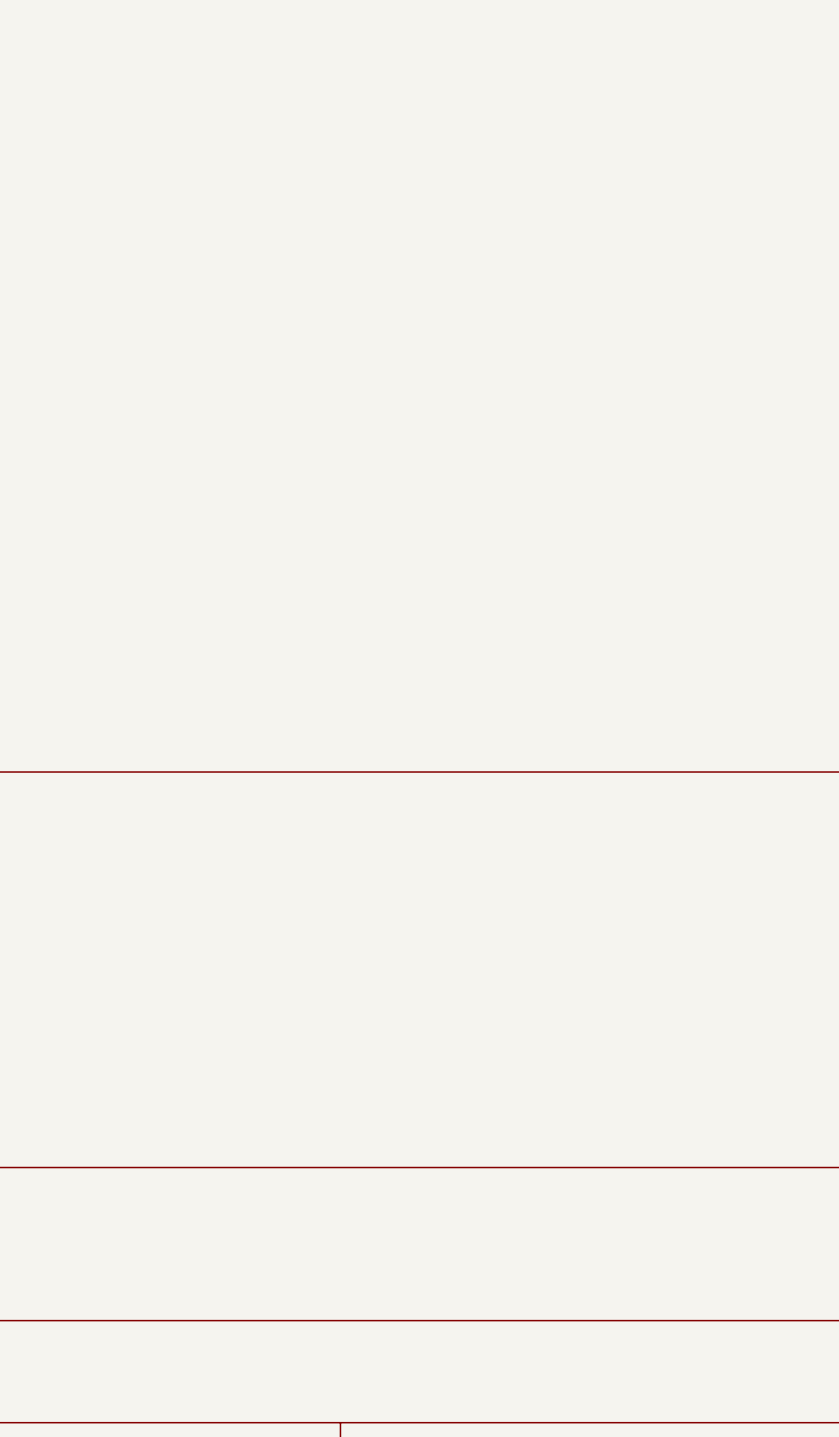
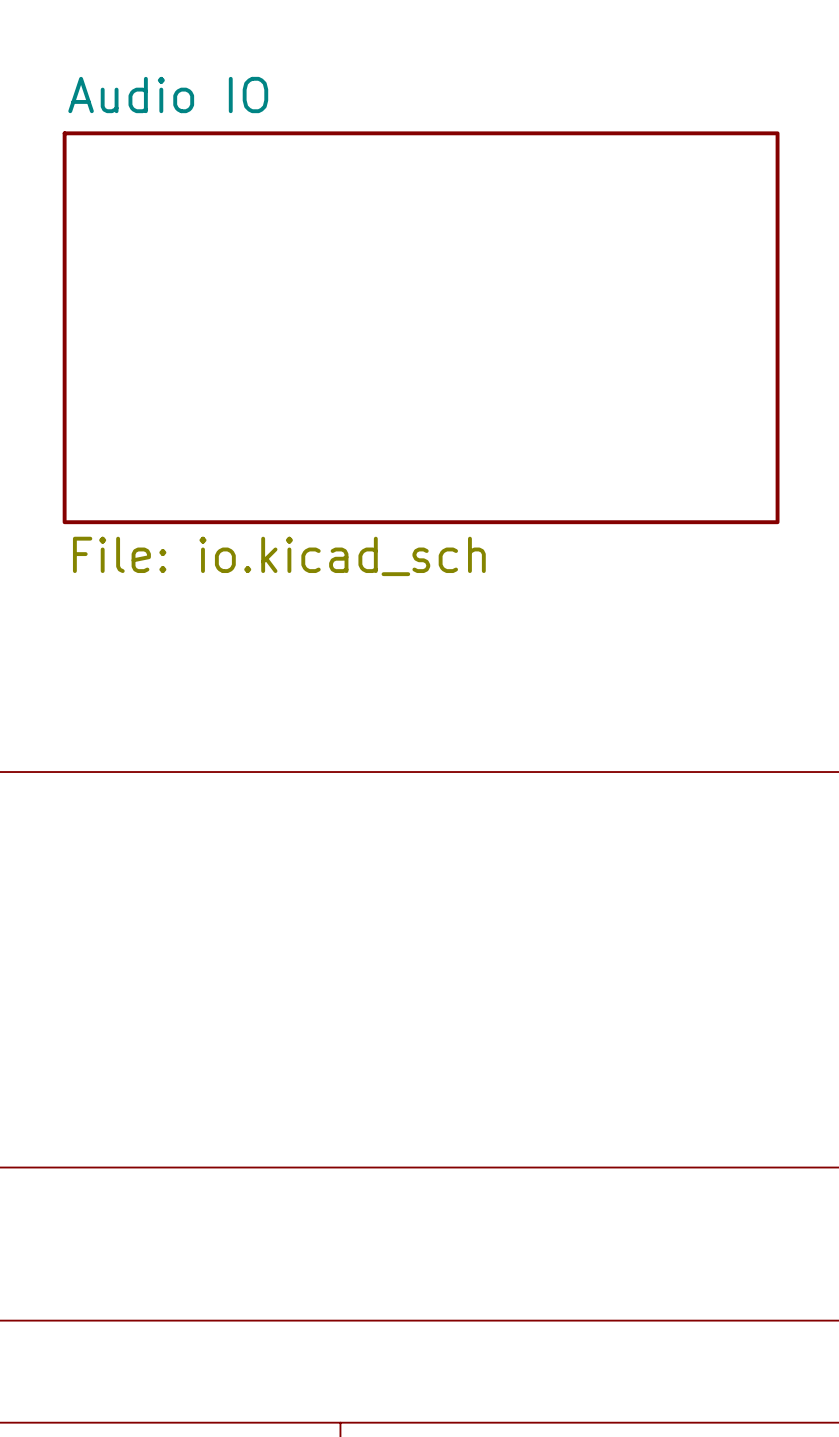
sheet Audio IO: none -> File: io.kicad_sch (421, 327)

